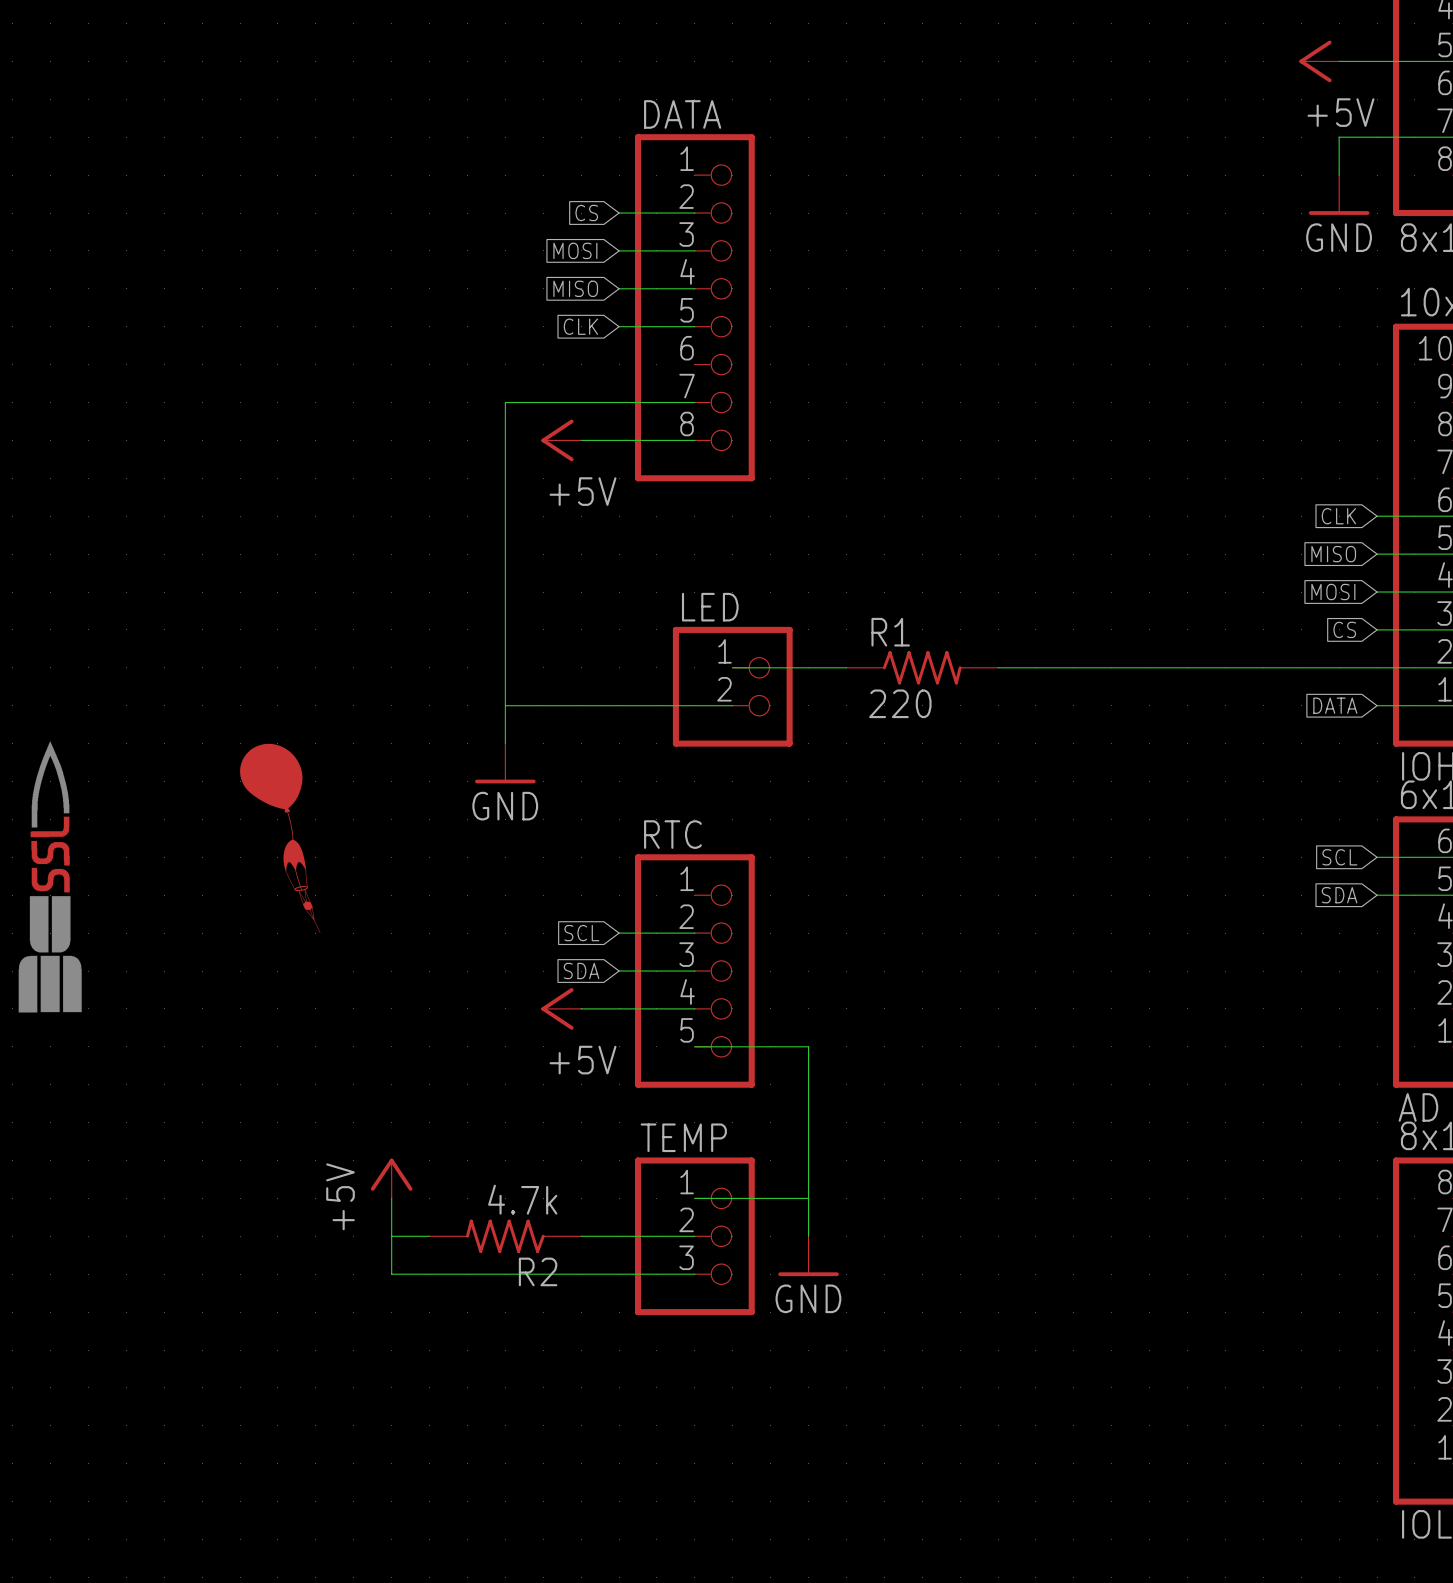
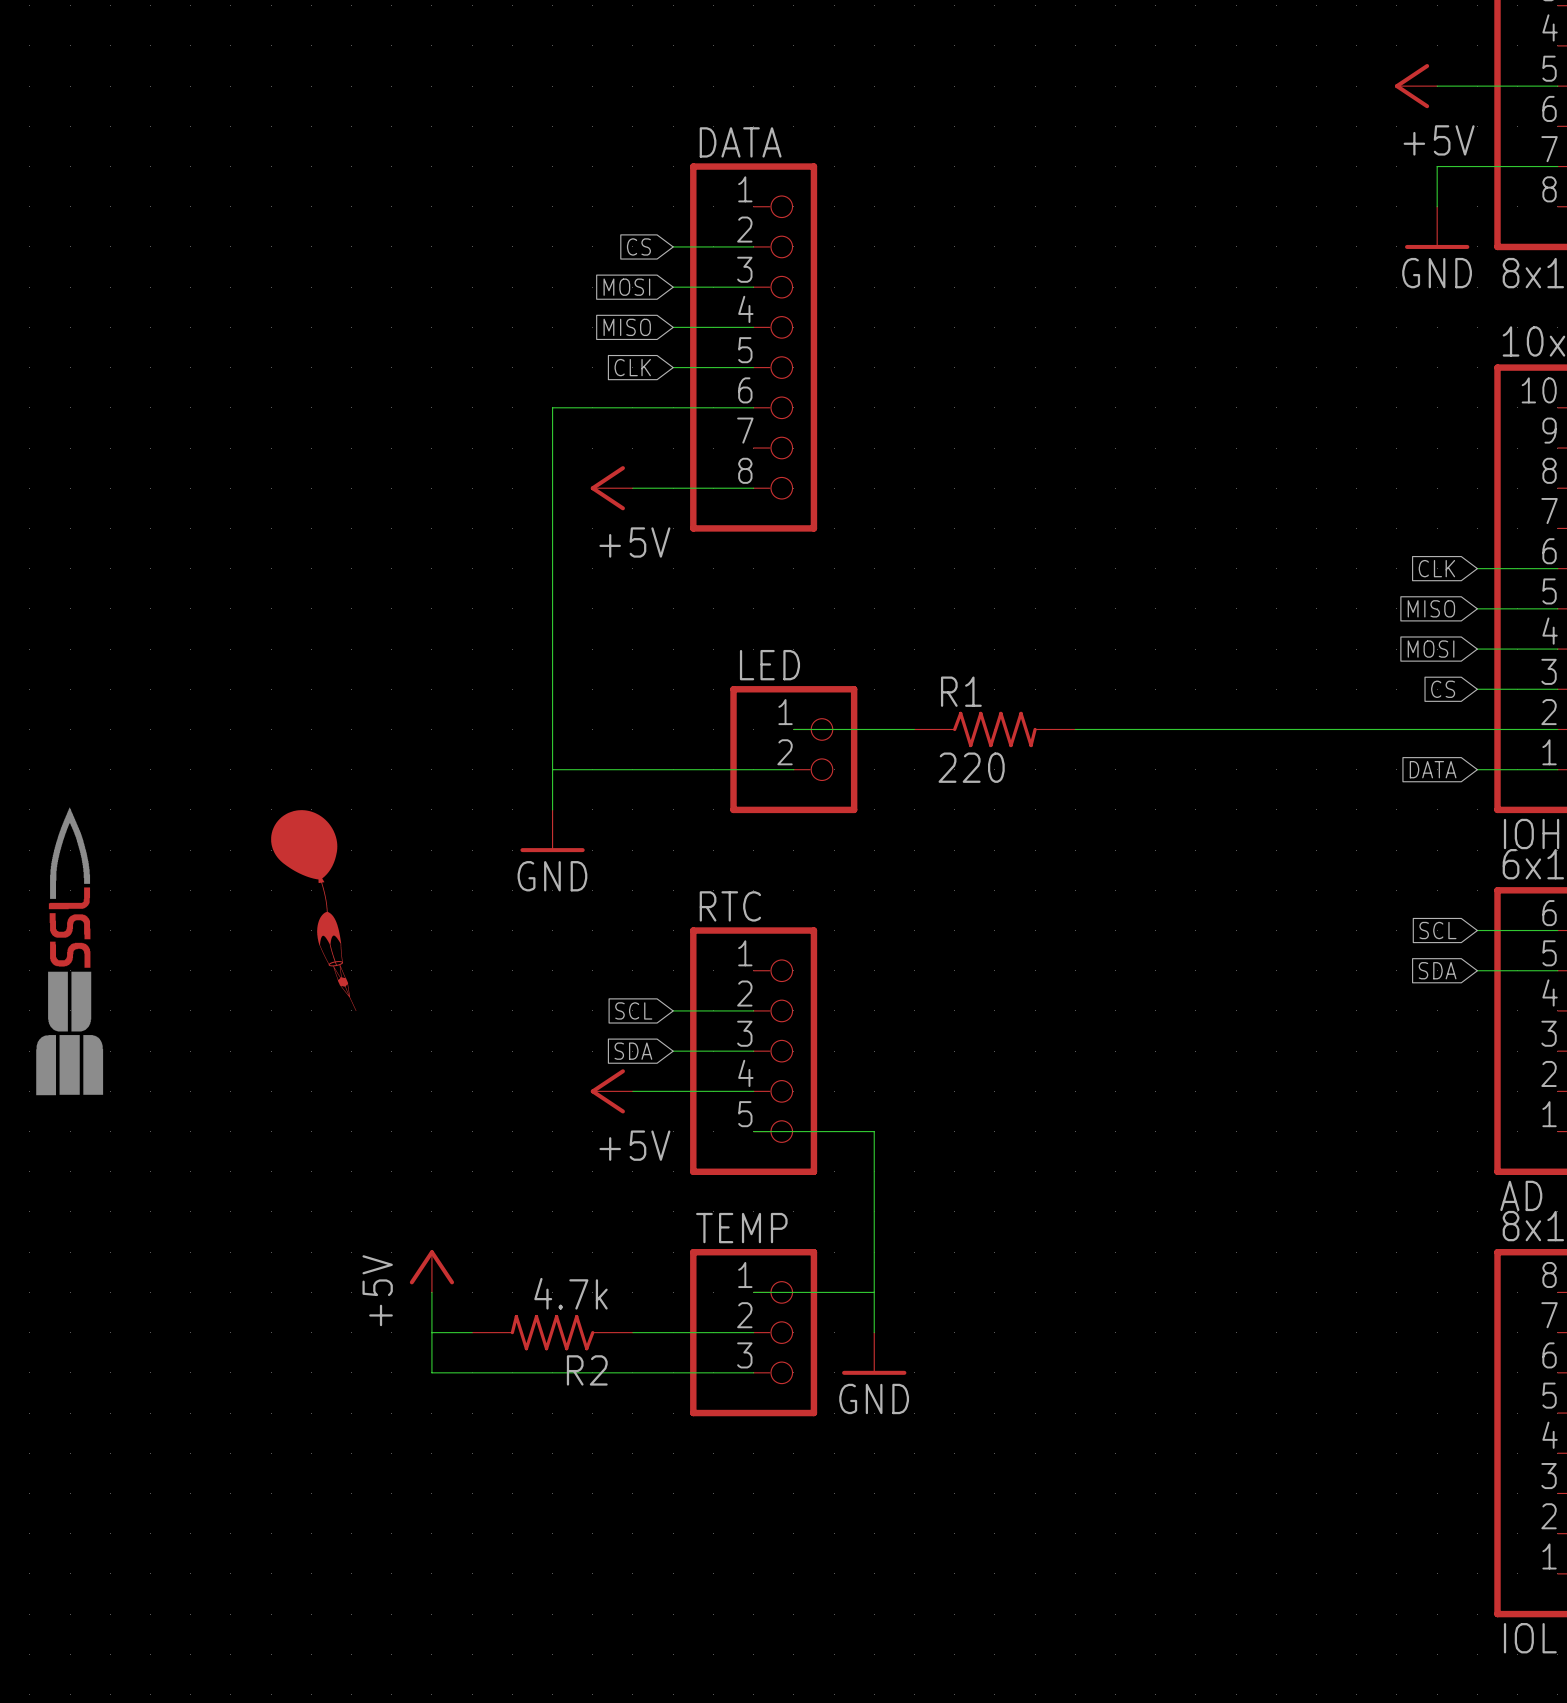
wire: (505, 402) (694, 402) -> (552, 448) (552, 407) (753, 407)

